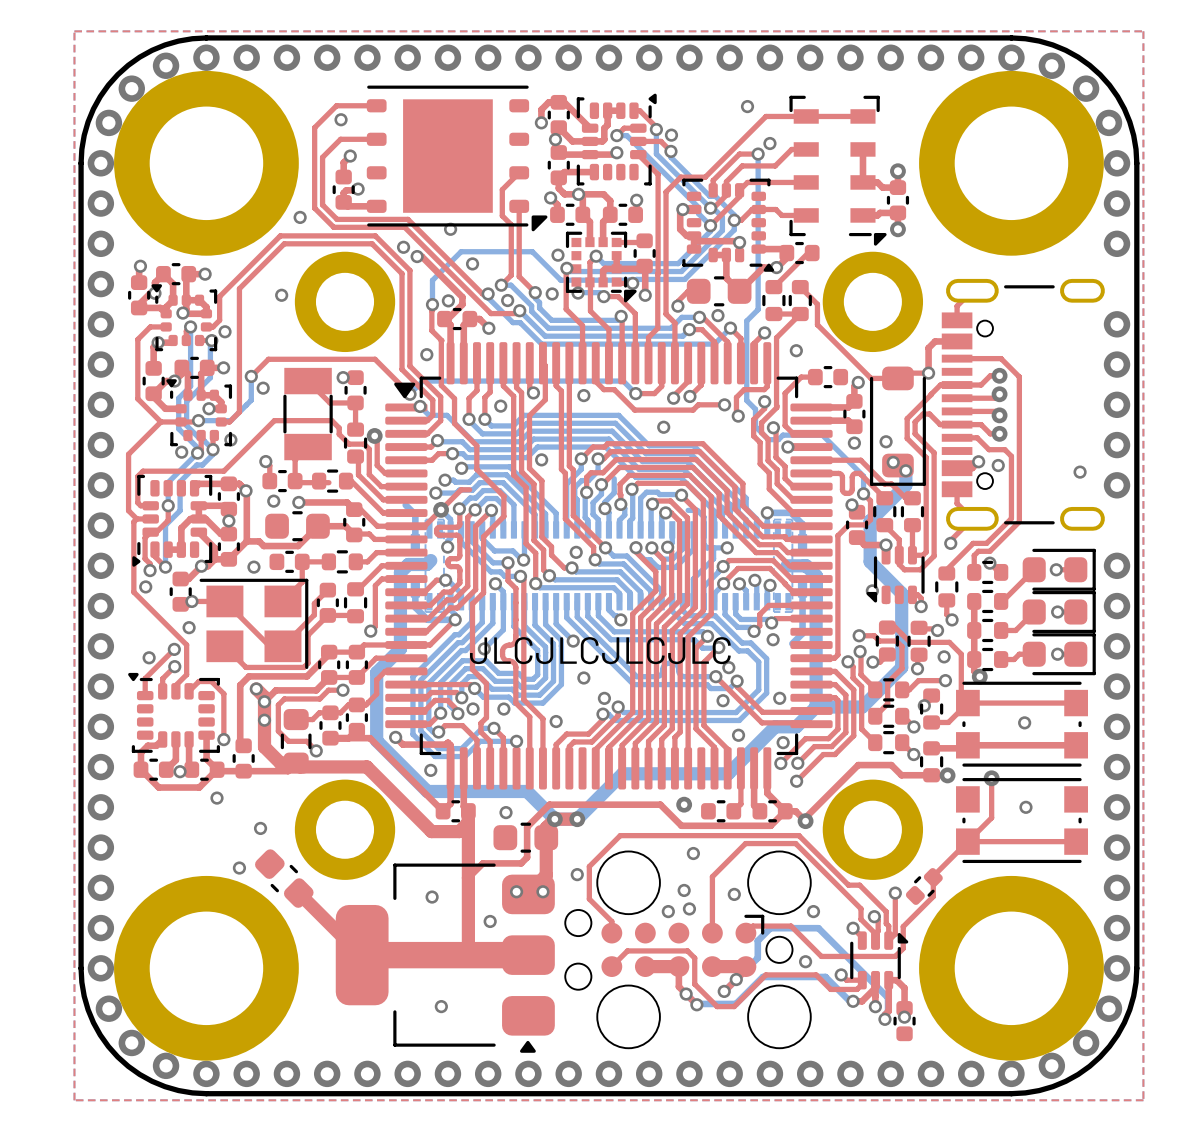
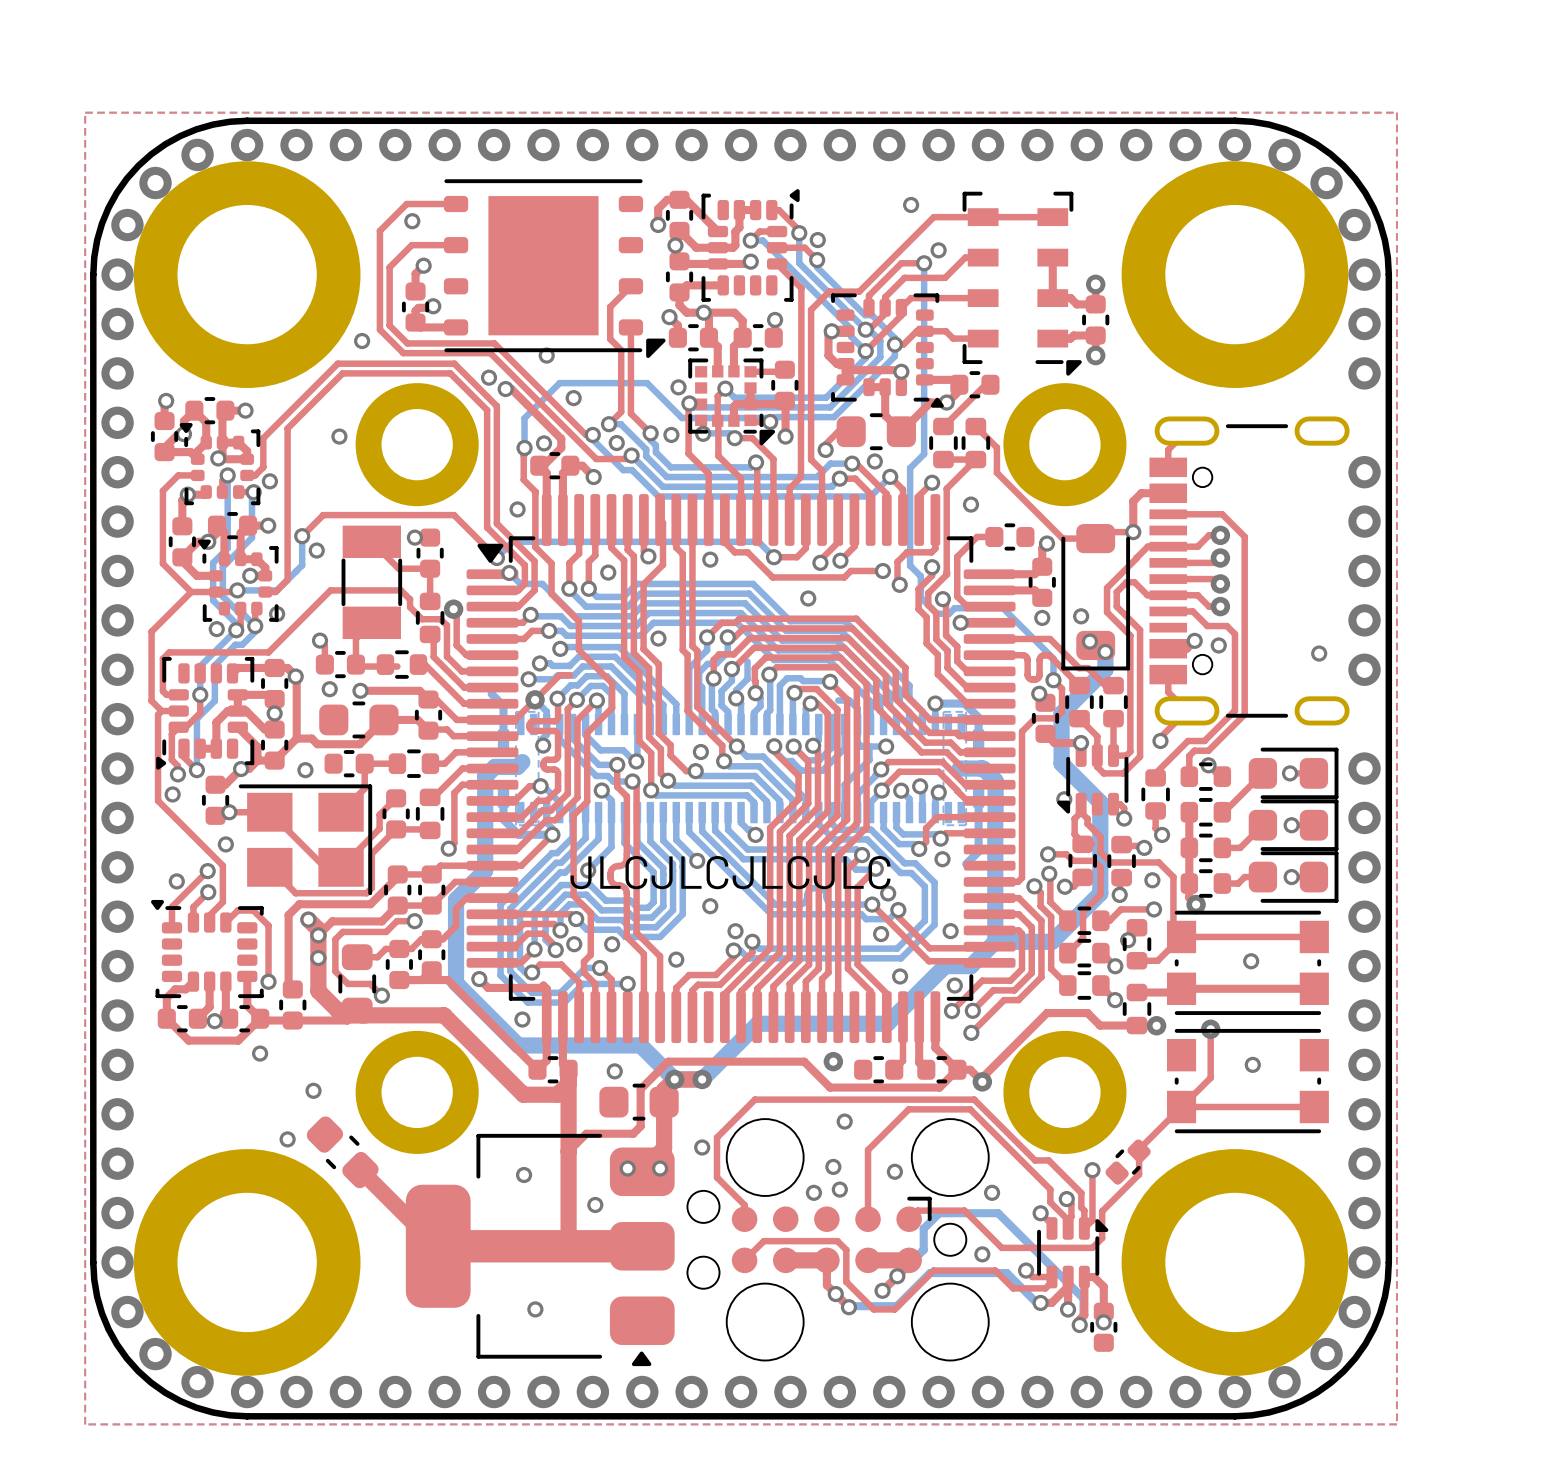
top track: none -> (1081, 812) (1074, 818) (1074, 834) (1083, 843)
top track: (894, 627) (901, 634) -> (1081, 812) (1087, 818) (1087, 823) (1100, 836) (1100, 852)

